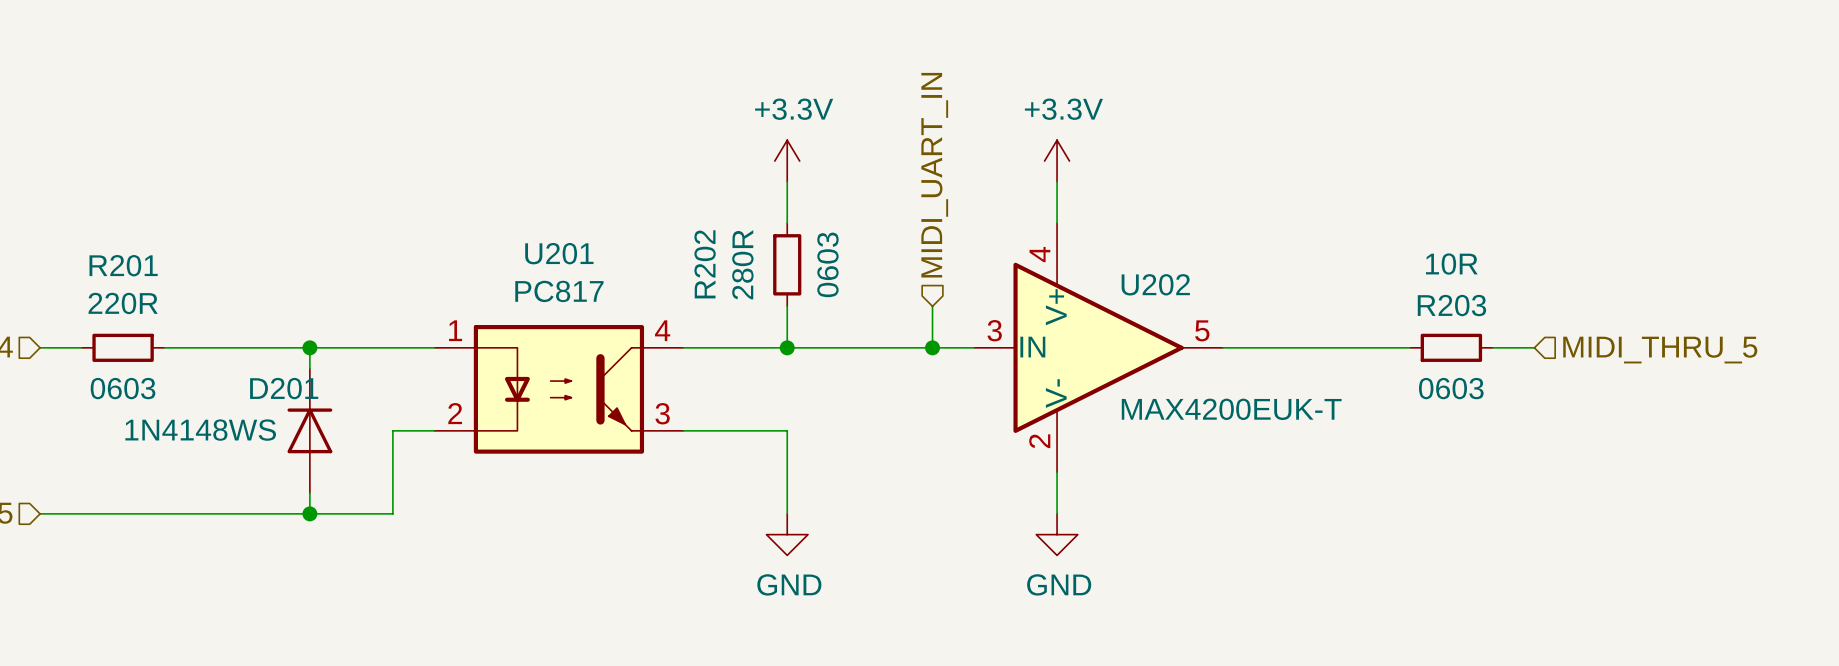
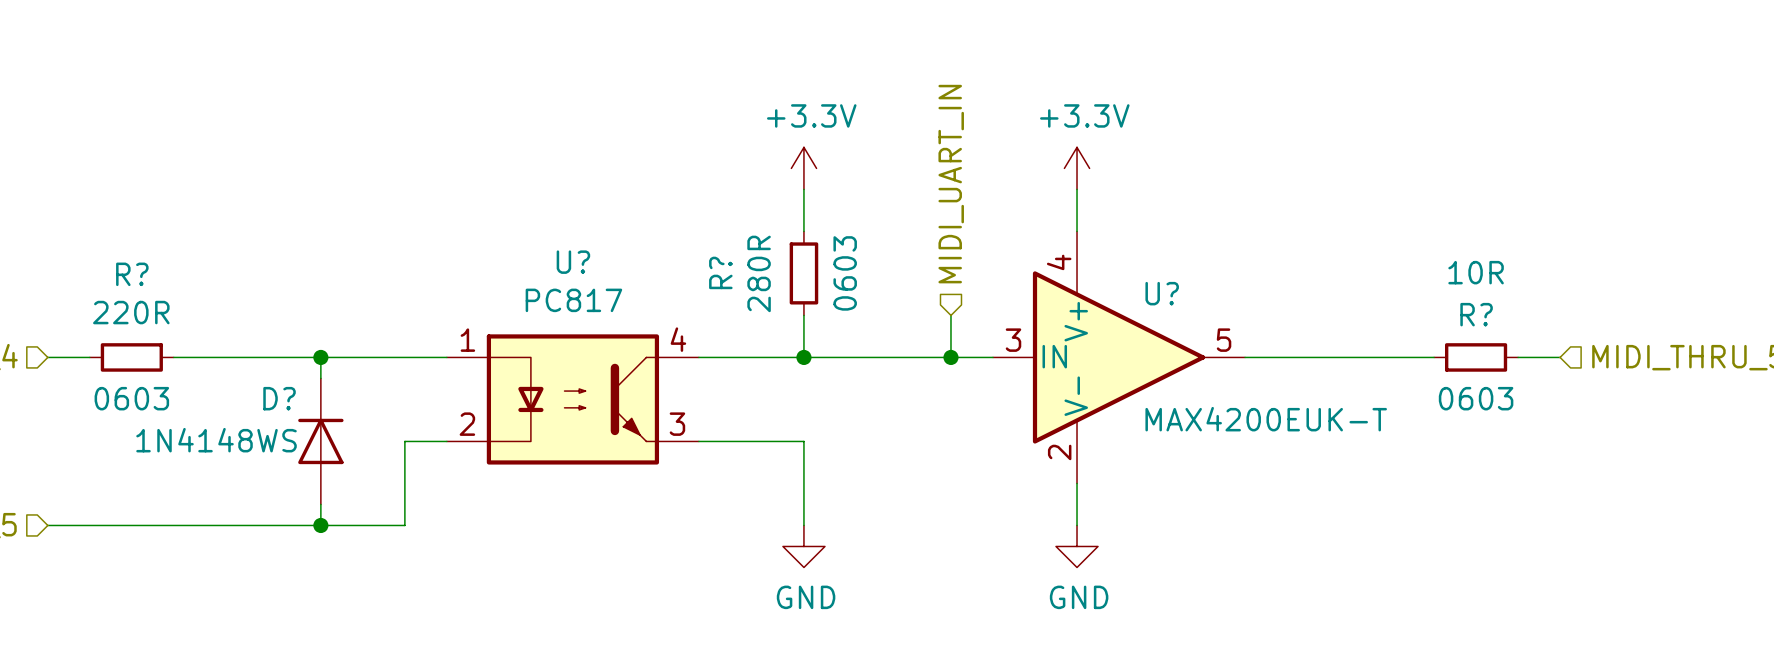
U201 name: U201 (559, 253) -> U? (573, 262)
R202 name: R202 (705, 264) -> R? (720, 272)
R201 name: R201 (123, 265) -> R? (132, 274)
U202 name: U202 (1155, 284) -> U? (1162, 293)
R203 name: R203 (1451, 305) -> R? (1476, 314)
D201 name: D201 (284, 388) -> D? (279, 398)

